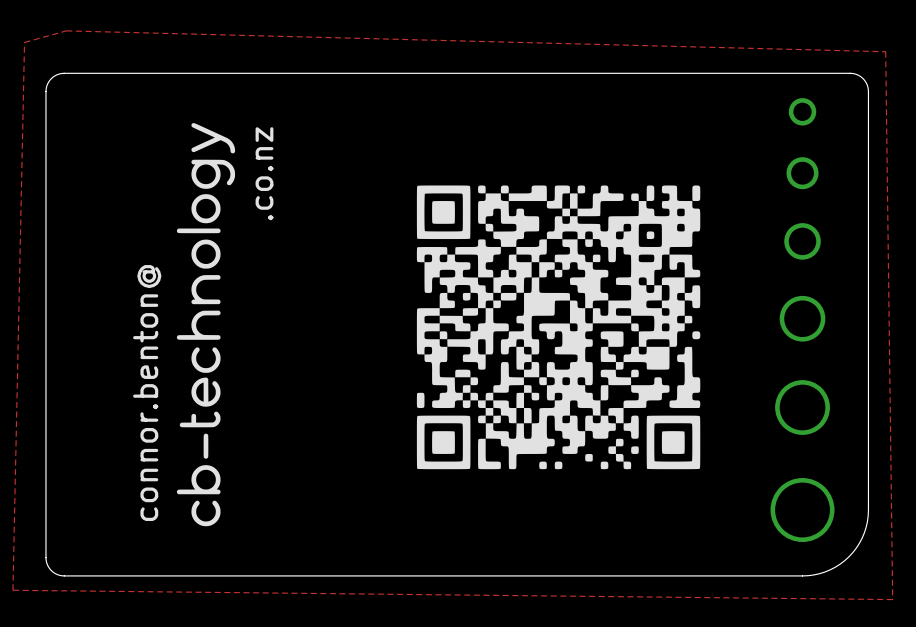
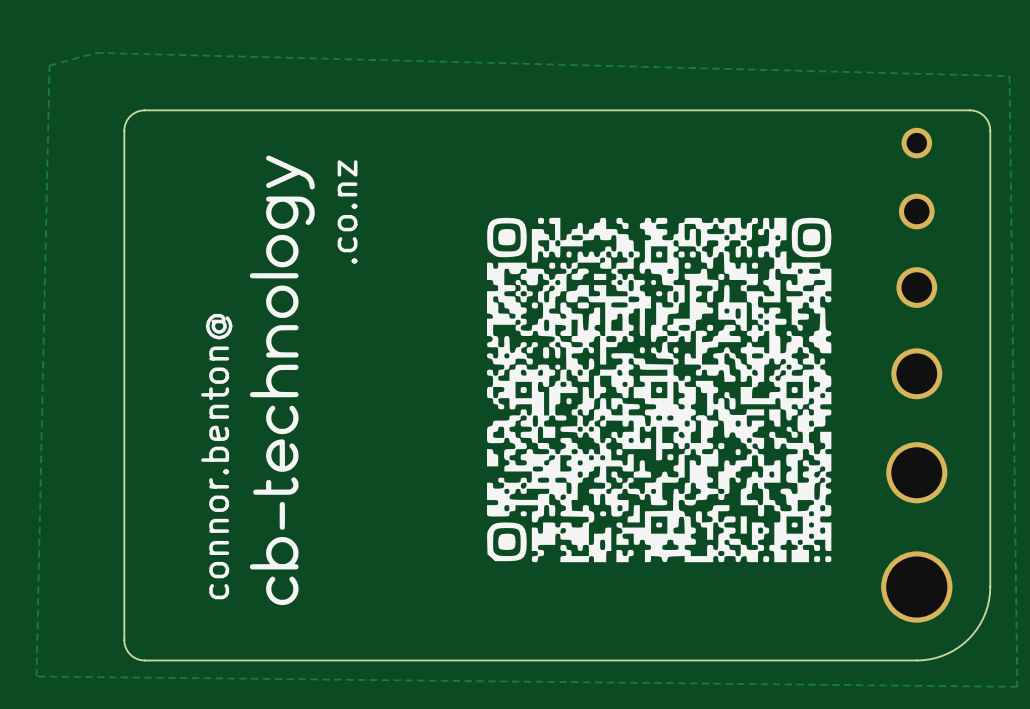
board edge: (868, 100) (868, 89) (865, 81) (858, 75) (850, 73) (64, 73) (54, 76) (47, 83) (45, 91) (46, 559) (51, 570) (60, 575) (109, 575) -> (990, 130) (988, 121) (984, 116) (978, 112) (969, 110) (144, 110) (133, 113) (127, 119) (124, 130) (124, 640) (125, 646) (130, 654) (137, 659) (144, 660)
text position: .co.nz (264, 173) -> .co.nz (347, 212)
drawing: none -> [486, 217, 832, 563]
drawing: [416, 185, 701, 470] -> none
drawing position: (205, 324) -> (282, 380)
text position: connor.benton@ (147, 393) -> connor.benton@ (216, 456)

